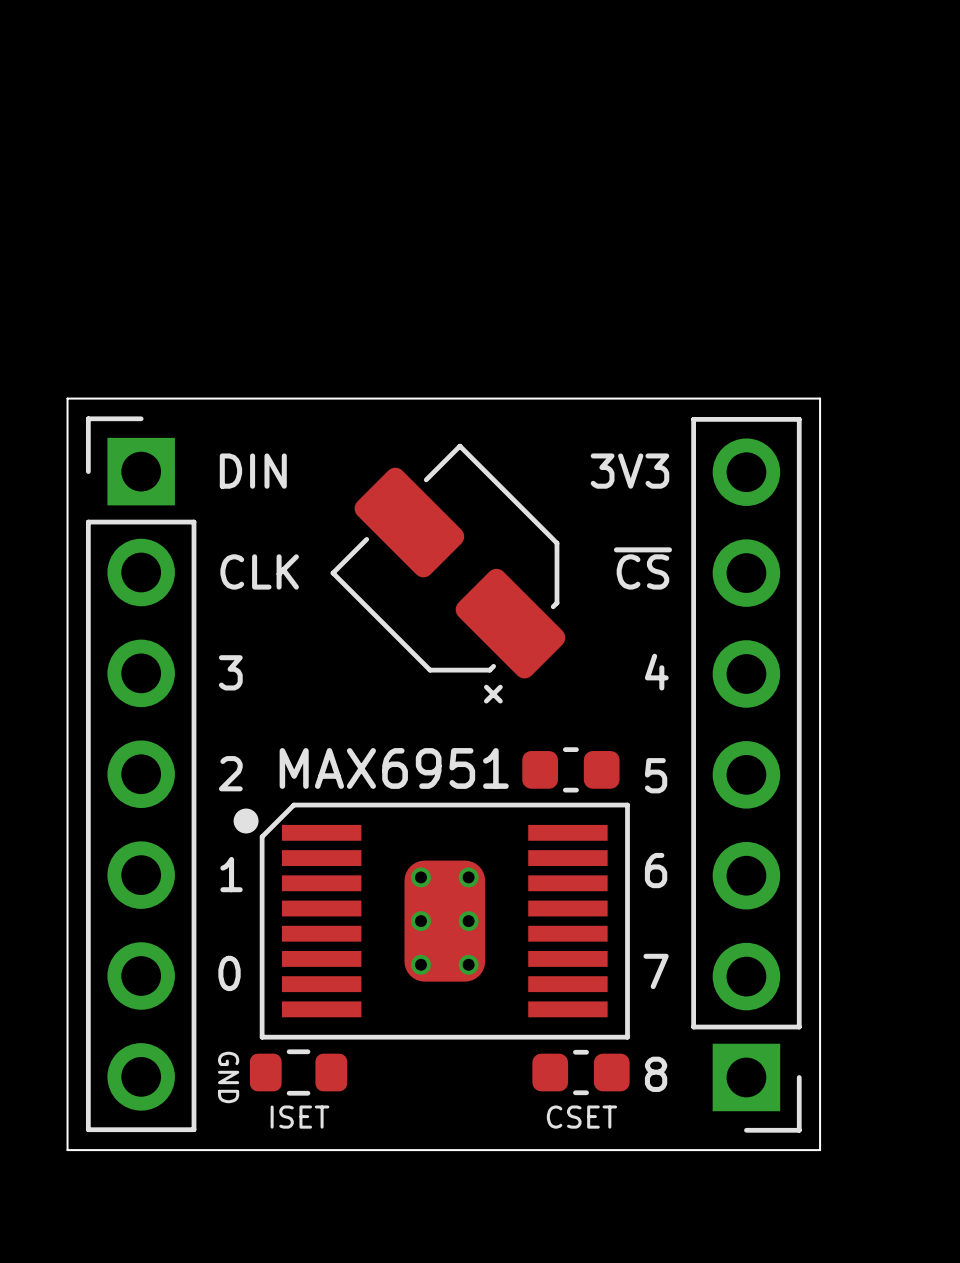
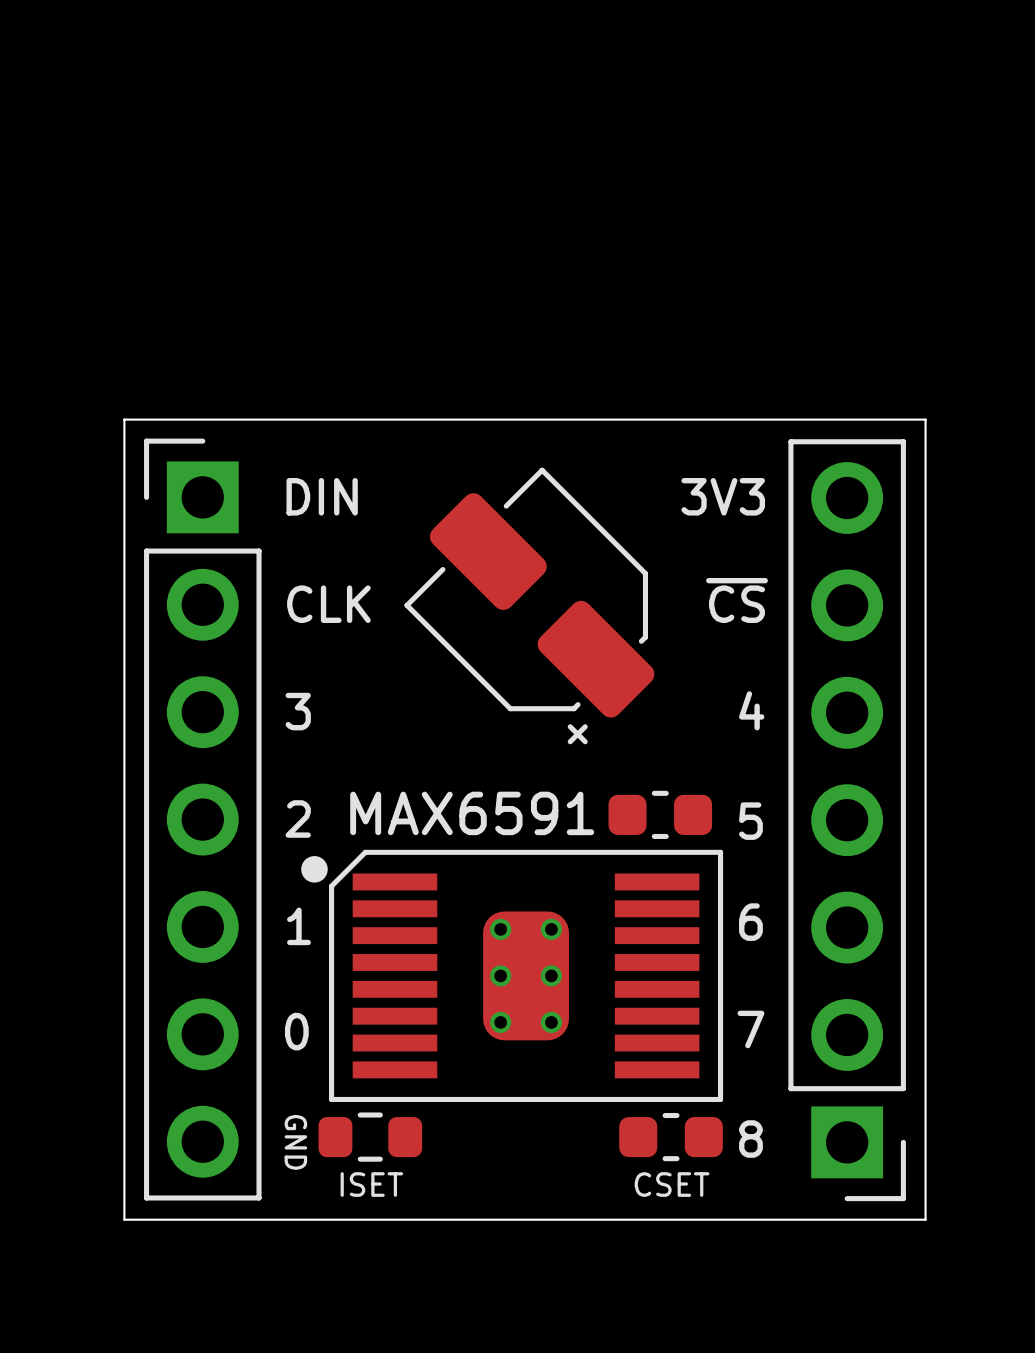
MAX6951 name: MAX6951 (394, 768) -> MAX6591 (472, 813)

